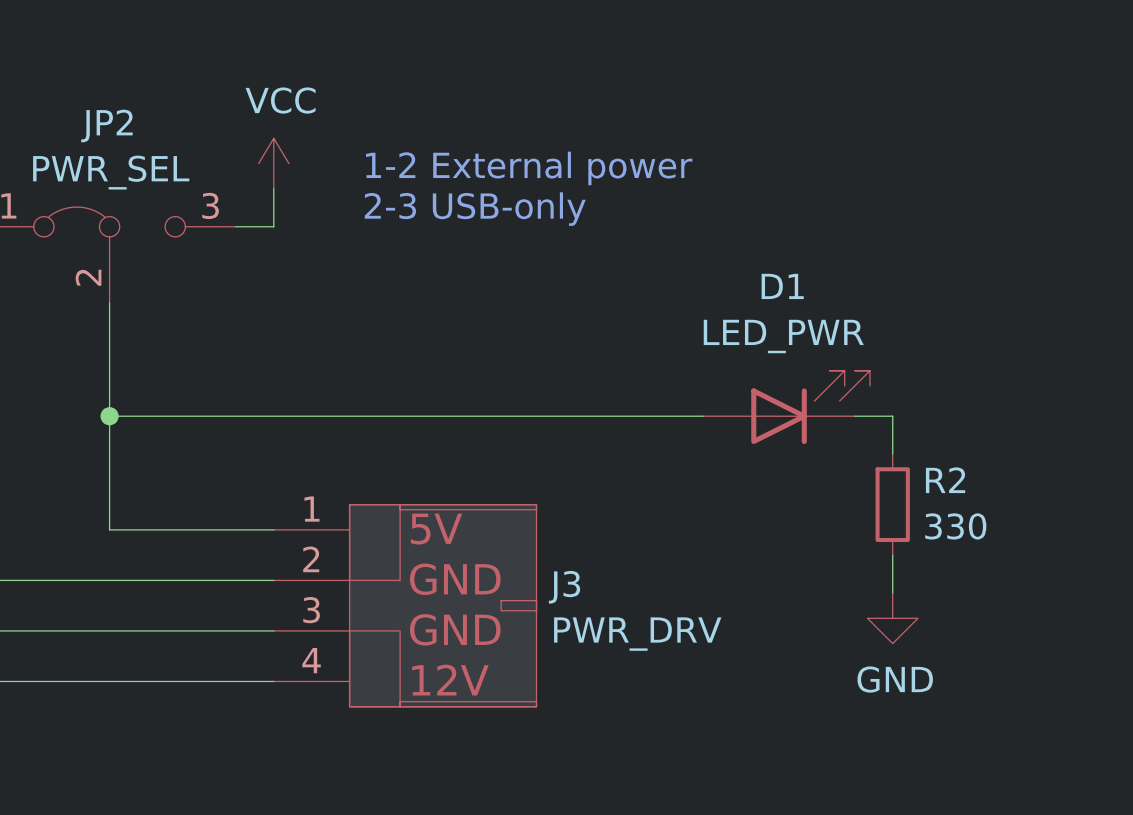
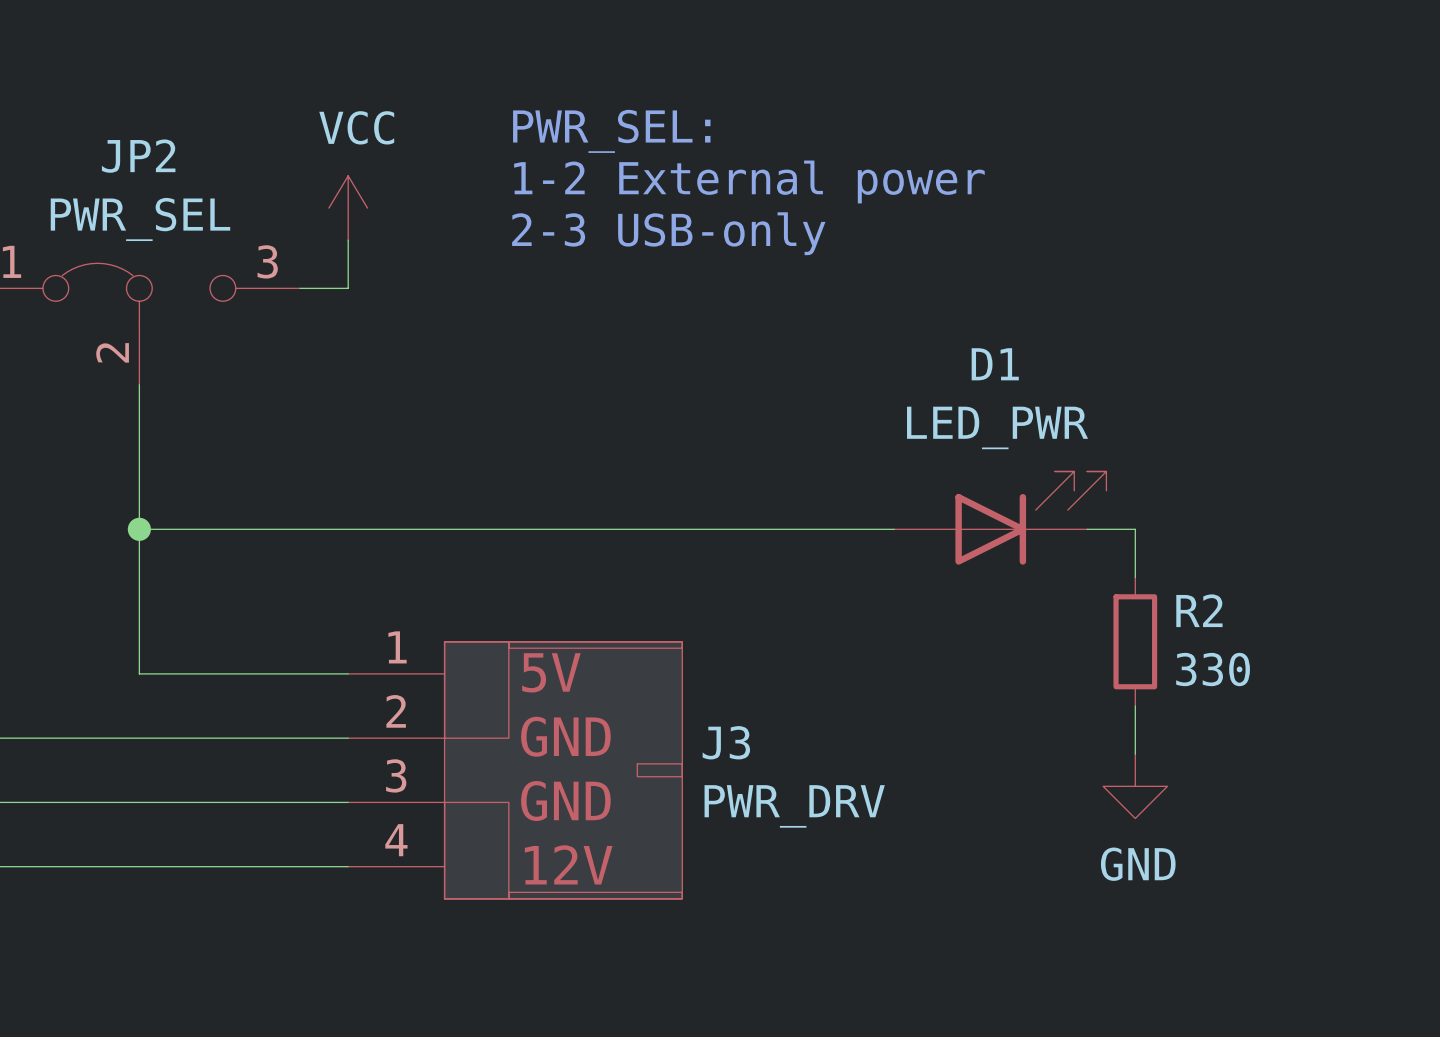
text: none -> PWR_SEL: (611, 131)
text position: 1-2 External power (529, 168) -> 1-2 External power (749, 181)
text position: 2-3 USB-only (475, 209) -> 2-3 USB-only (668, 233)

